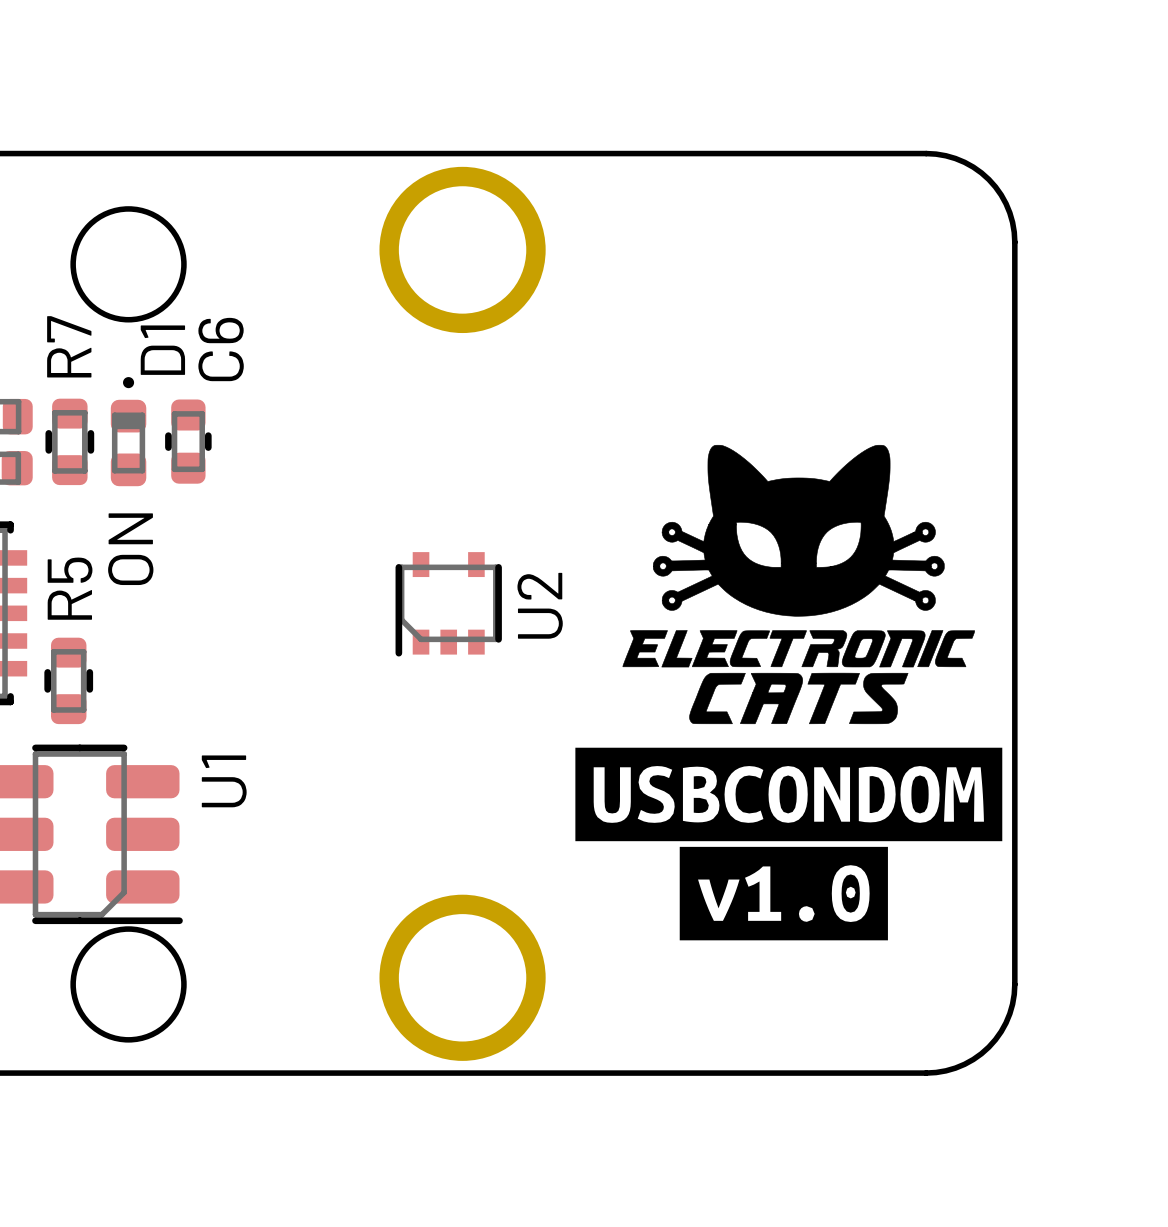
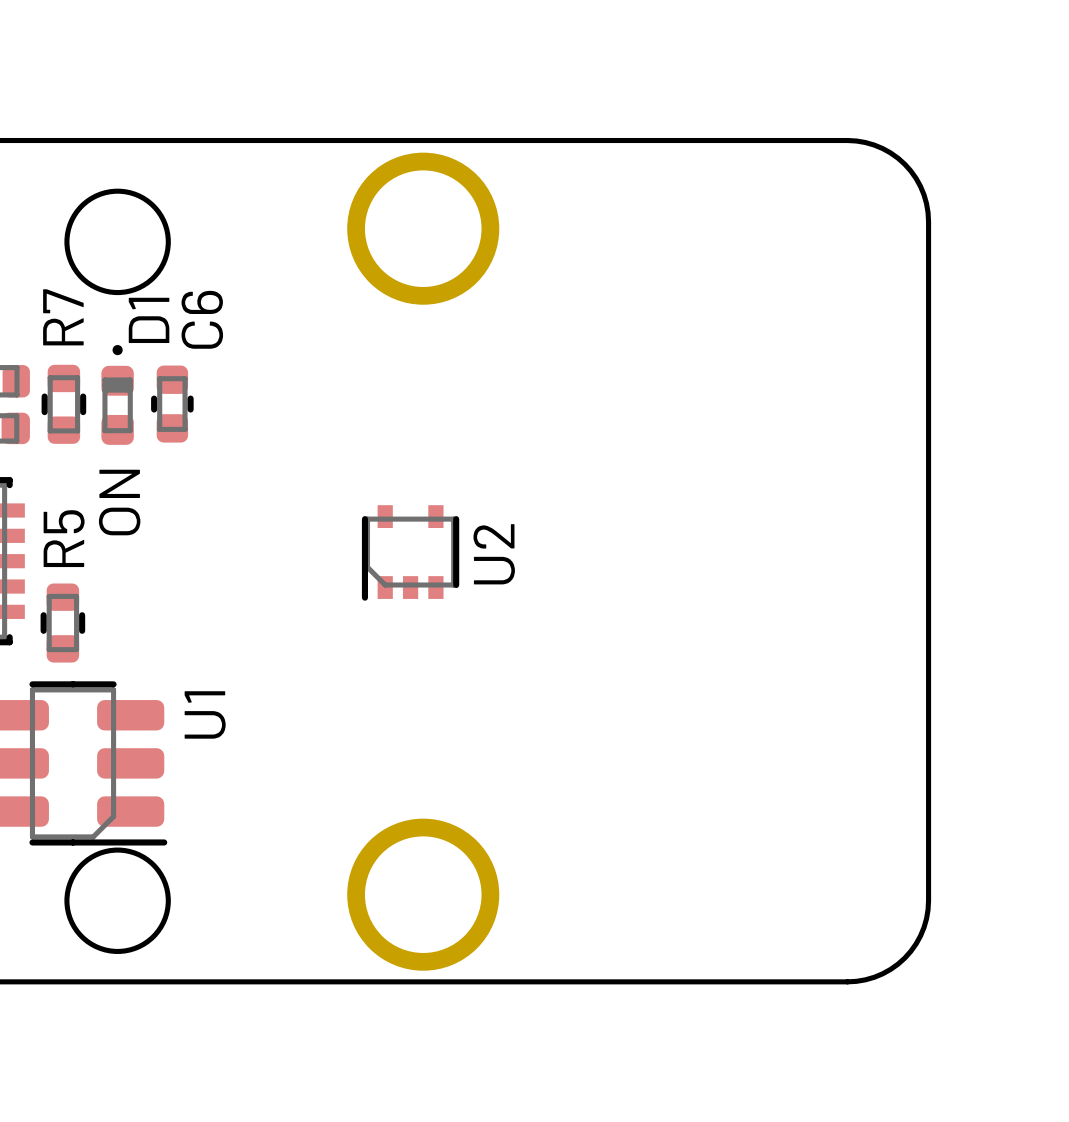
drawing: [575, 444, 1003, 941] -> none

